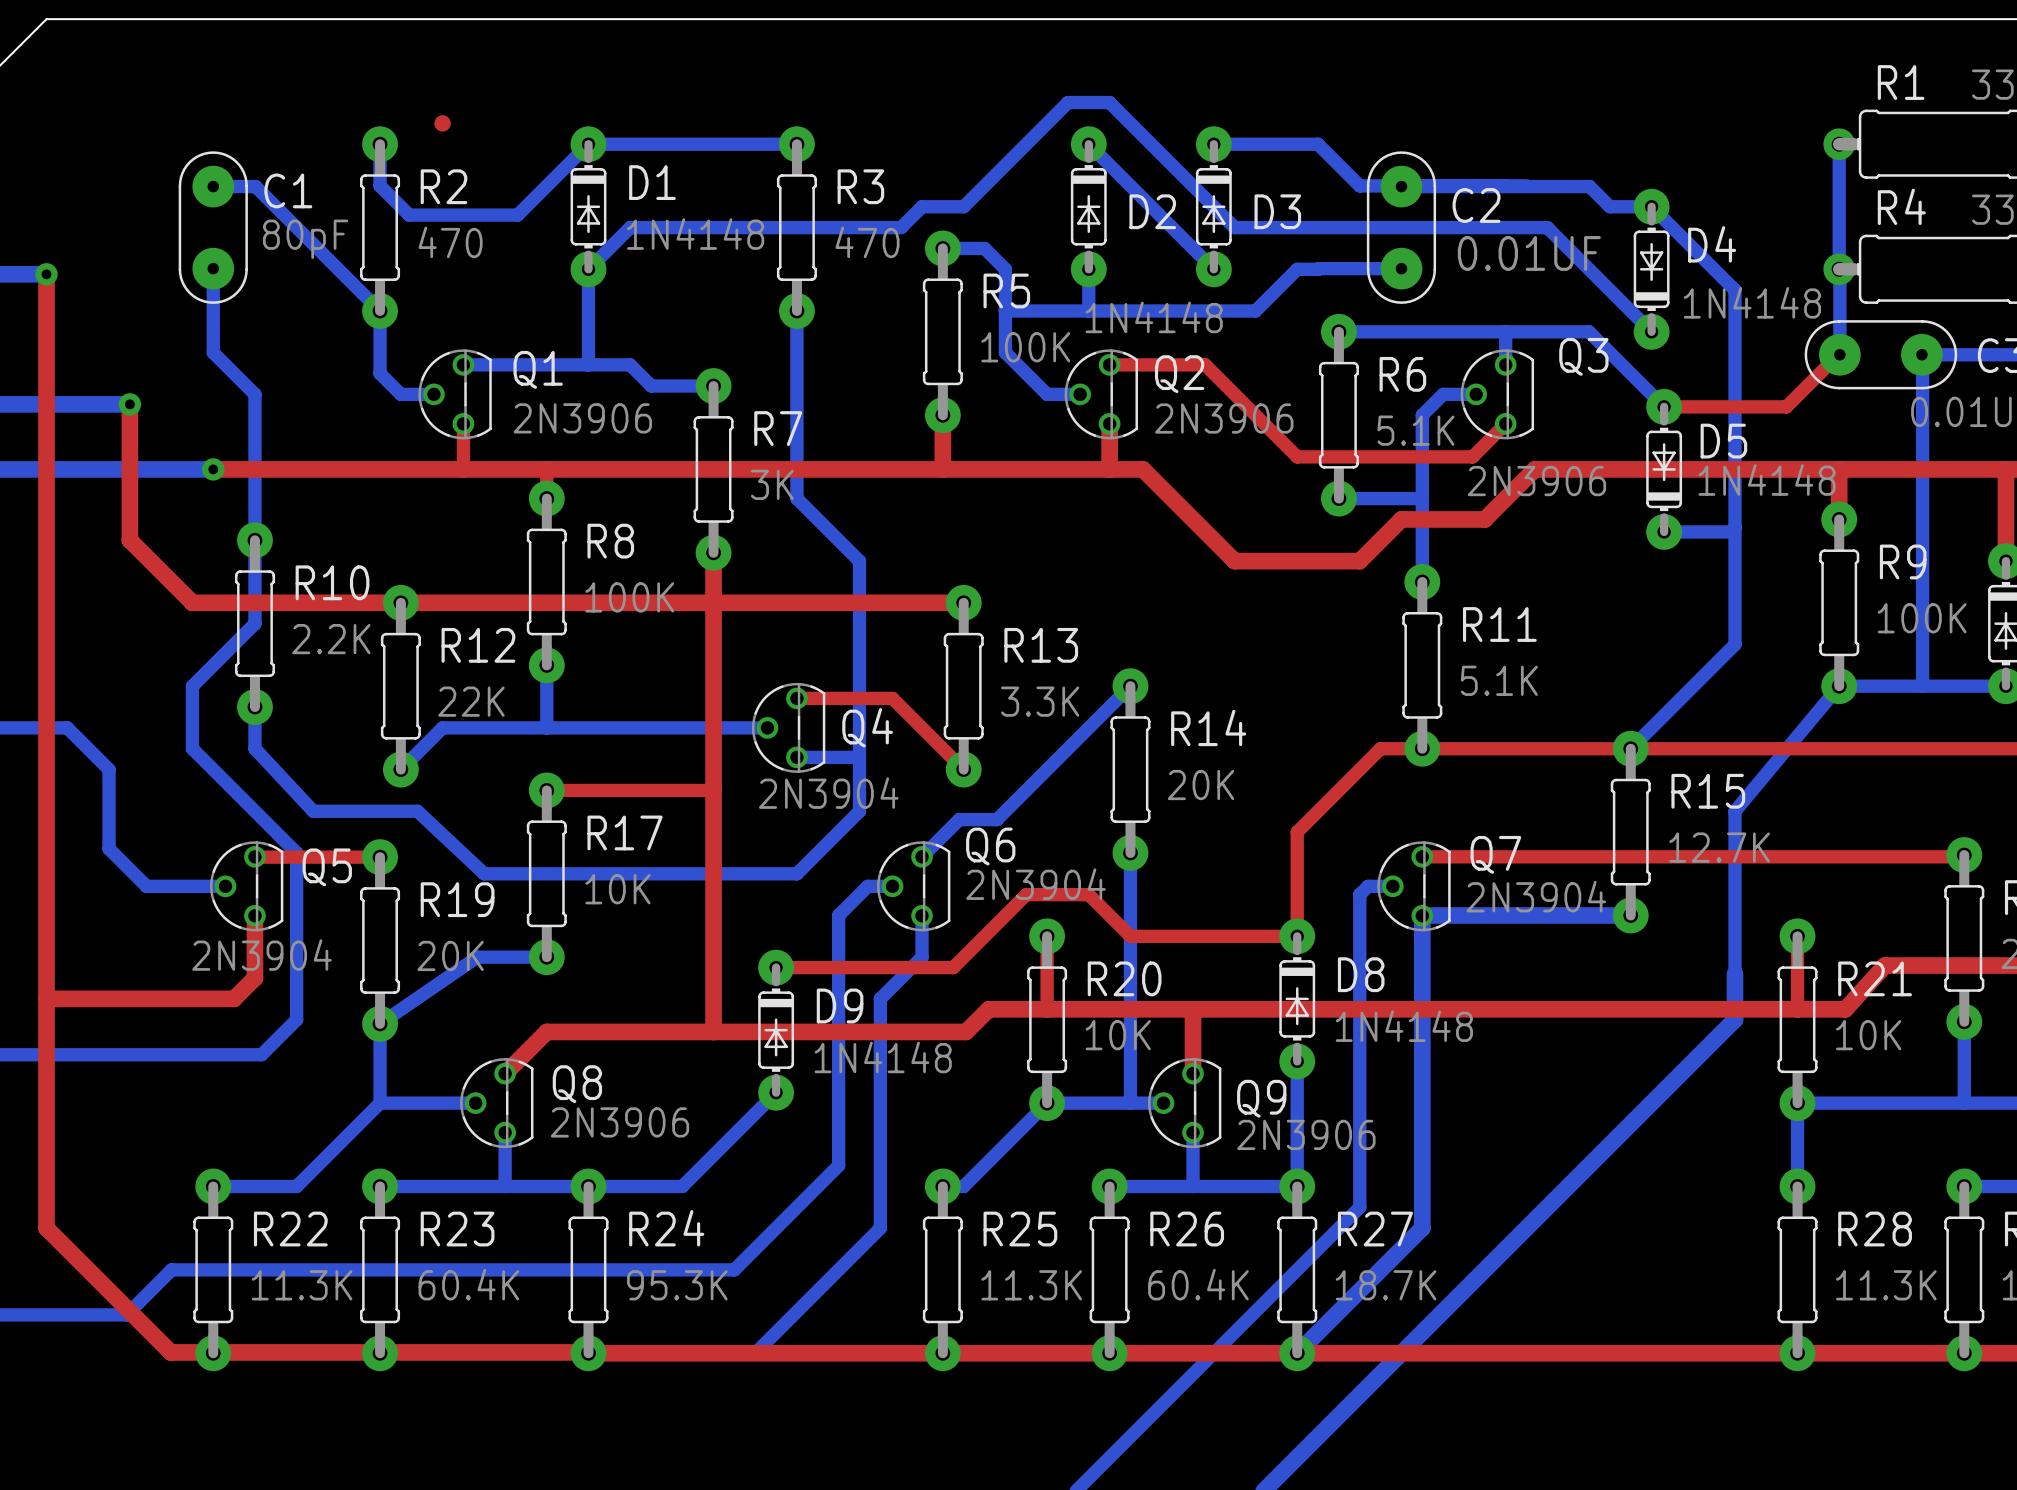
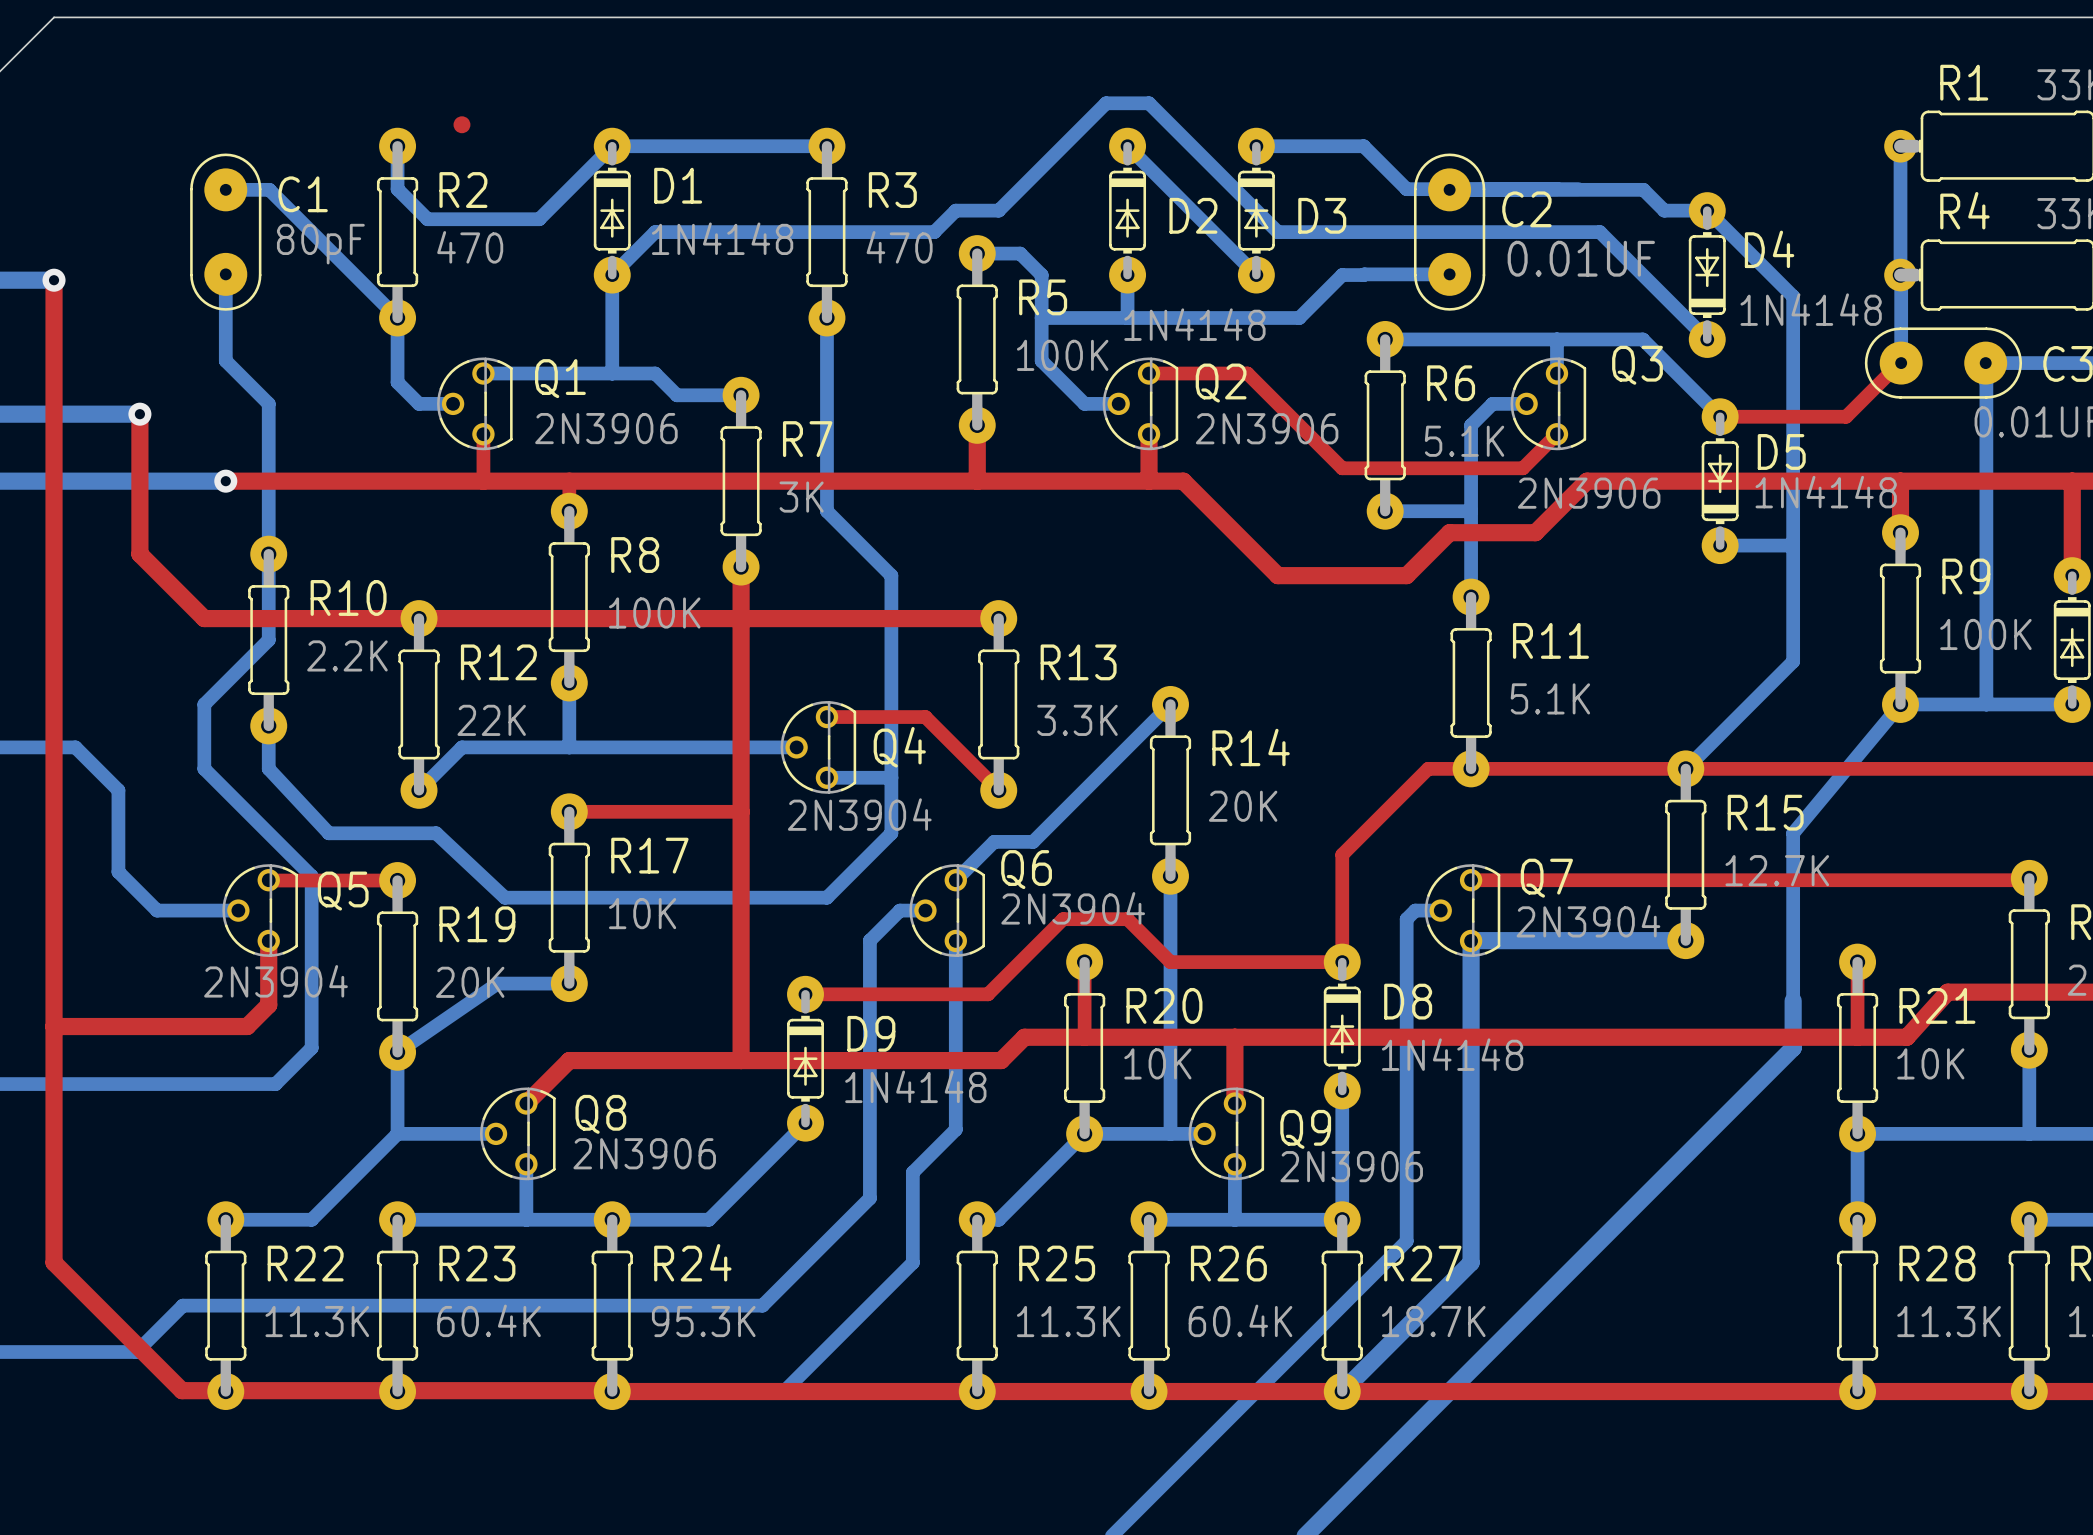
bottom track: (922, 957) (880, 998) (880, 1140) -> (955, 983) (955, 1129) (912, 1172)

